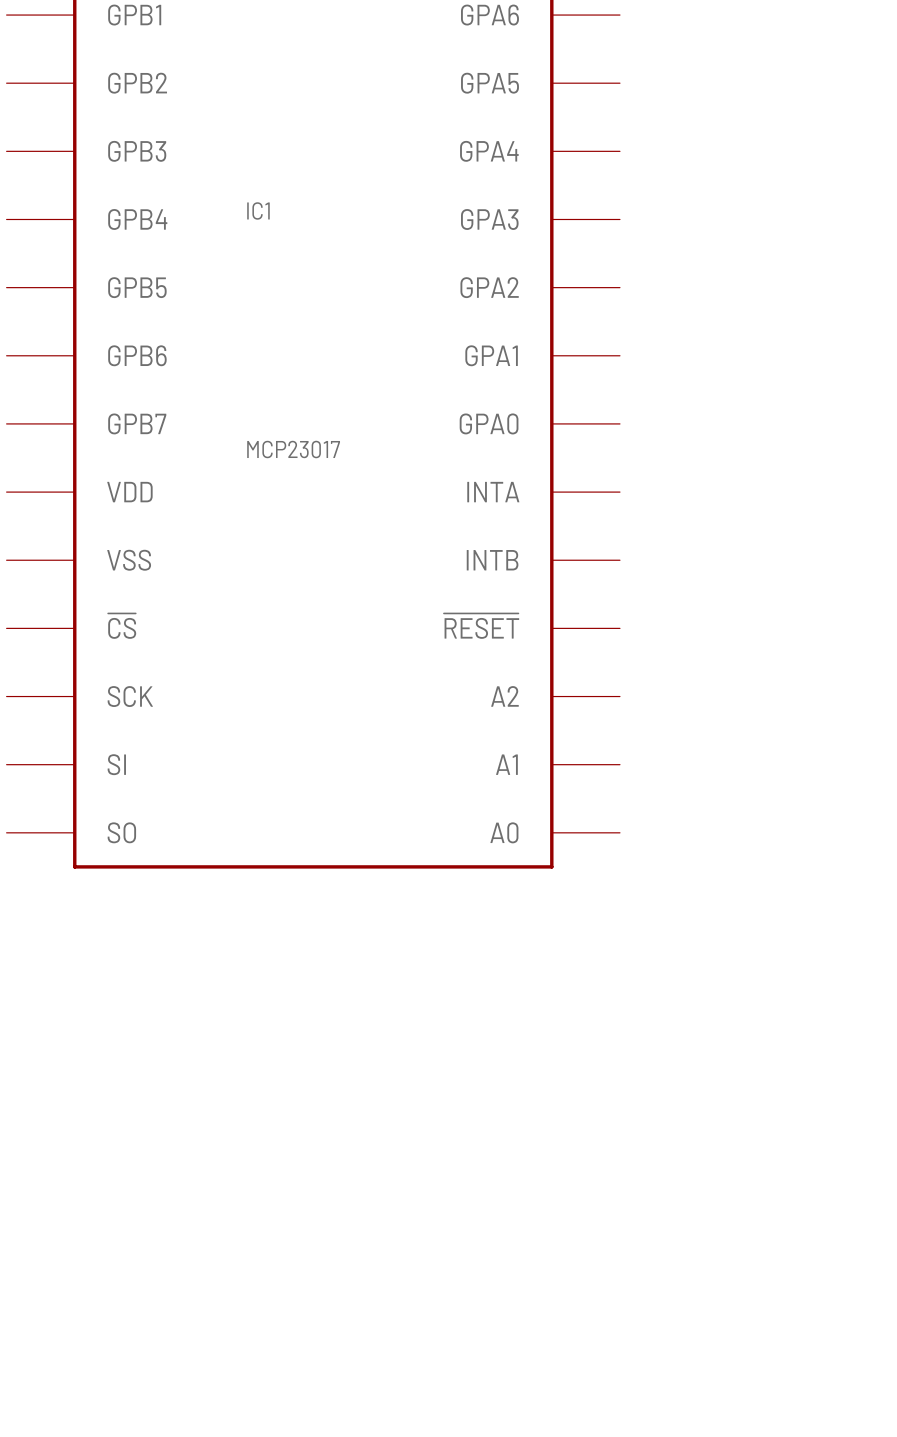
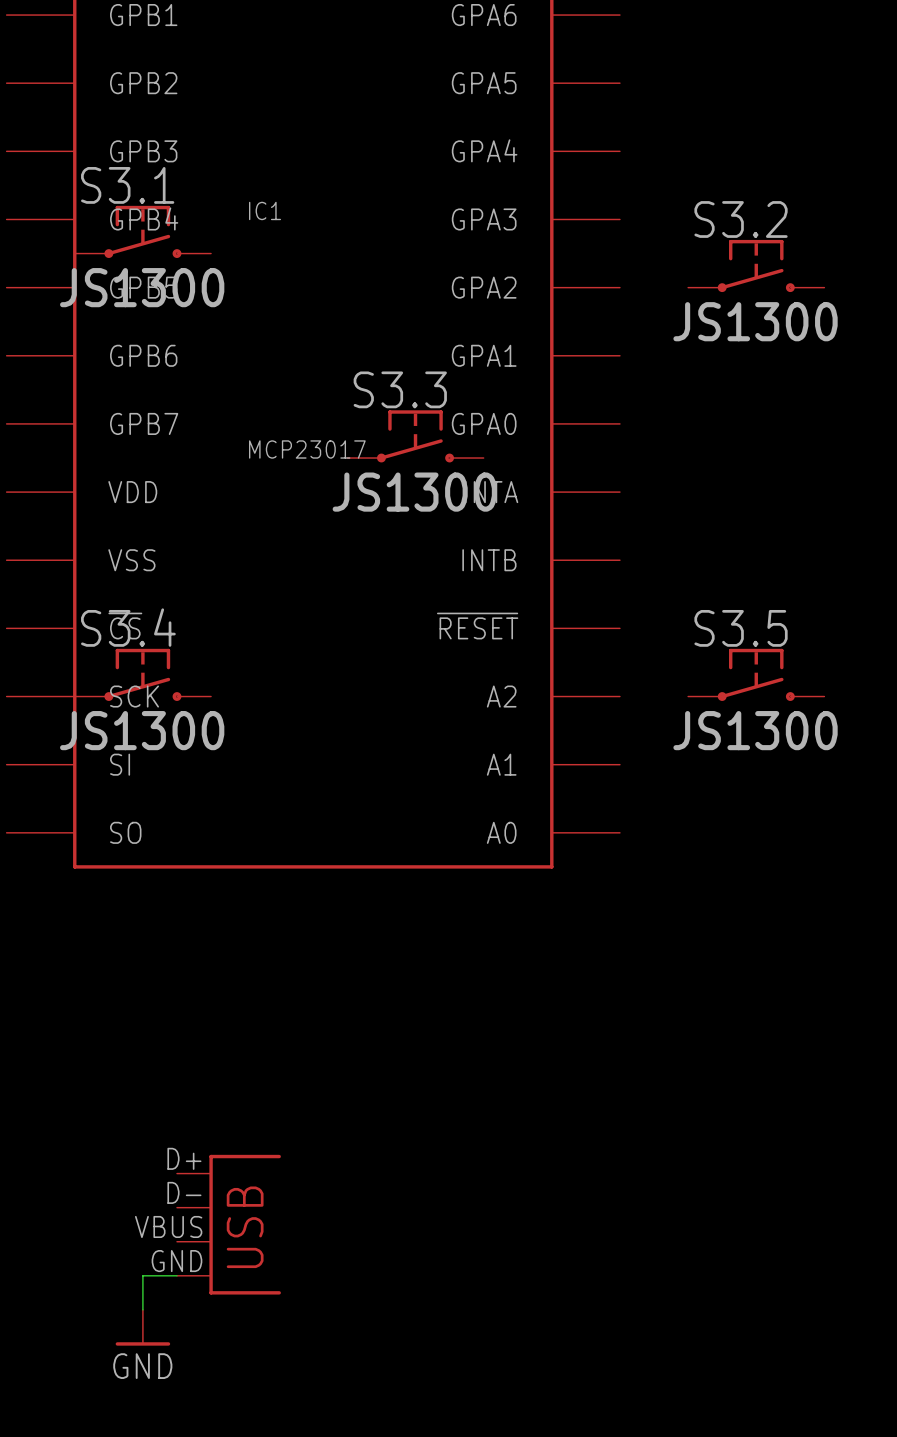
S3.1: none -> JS1300 (142, 231)
S3.2: none -> JS1300 (756, 266)
S3.3: none -> JS1300 (415, 436)
S3.4: none -> JS1300 (142, 674)
S3.5: none -> JS1300 (756, 674)
part: none -> (228, 1224)
wire: none -> (176, 1275) (142, 1275) (142, 1309)
power symbol: none -> GND (142, 1327)

